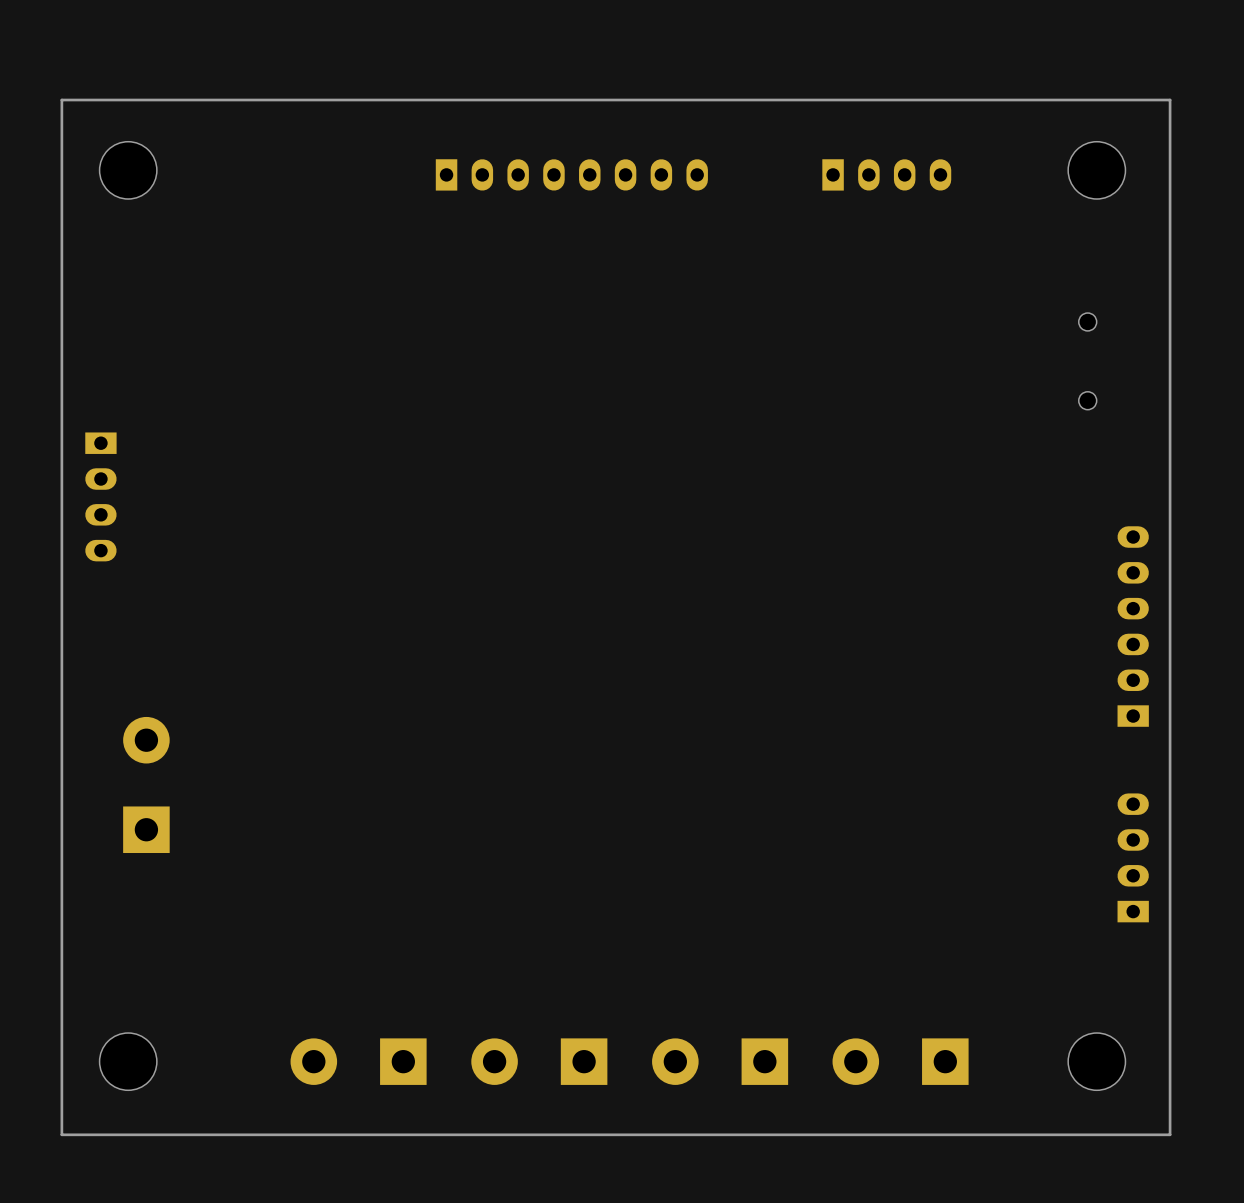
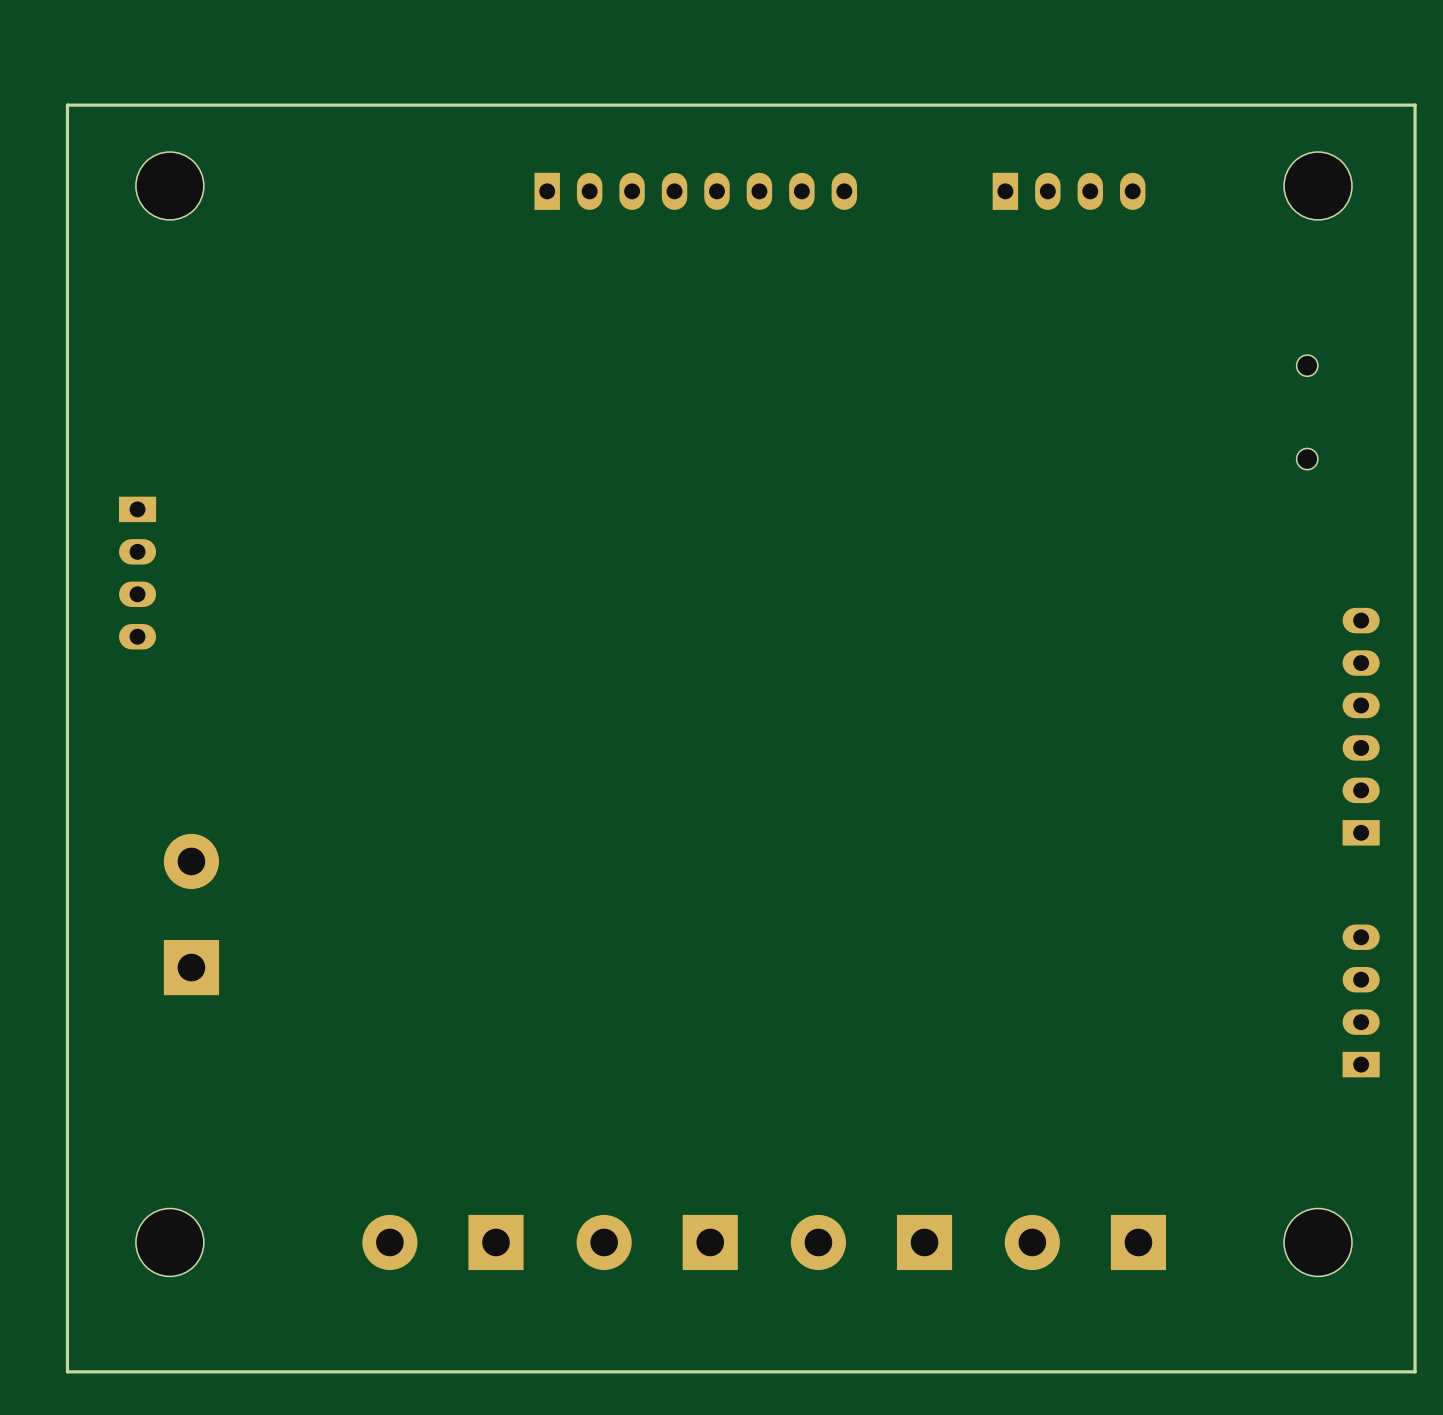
board edge: (1170, 100) (61, 100) (61, 1134) (1170, 1134) (1170, 100) -> (1415, 105) (1415, 1371) (67, 1371) (67, 105) (1415, 105)

